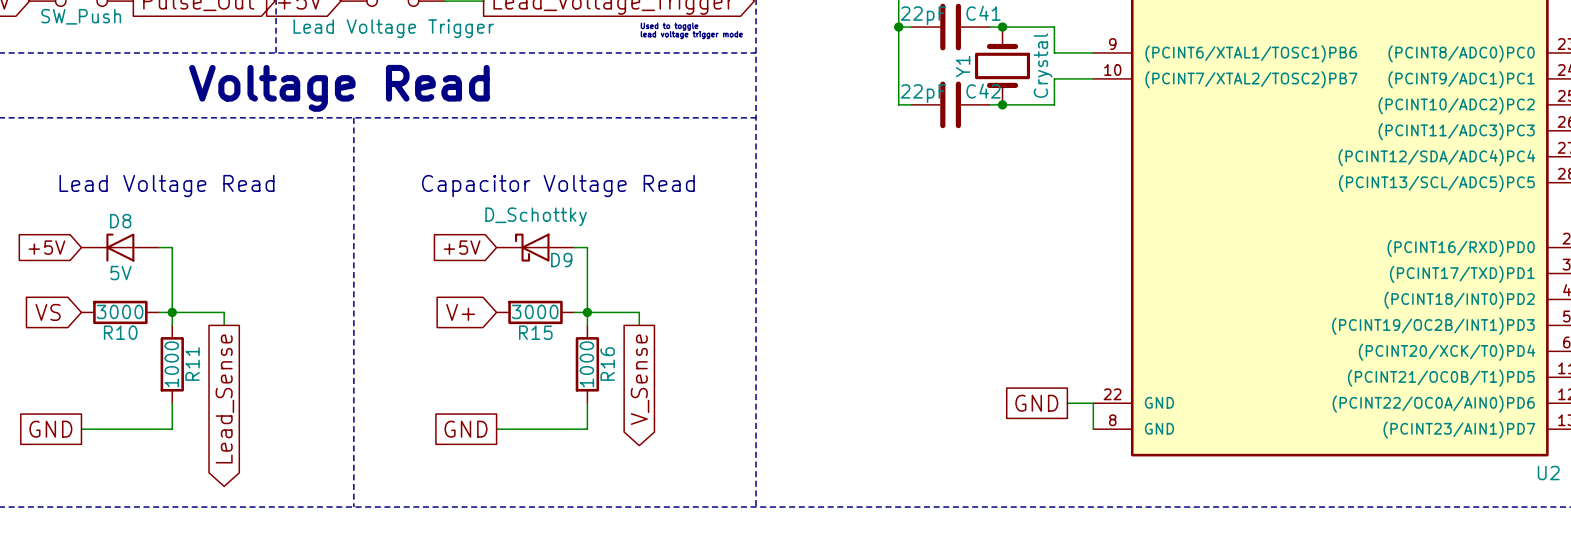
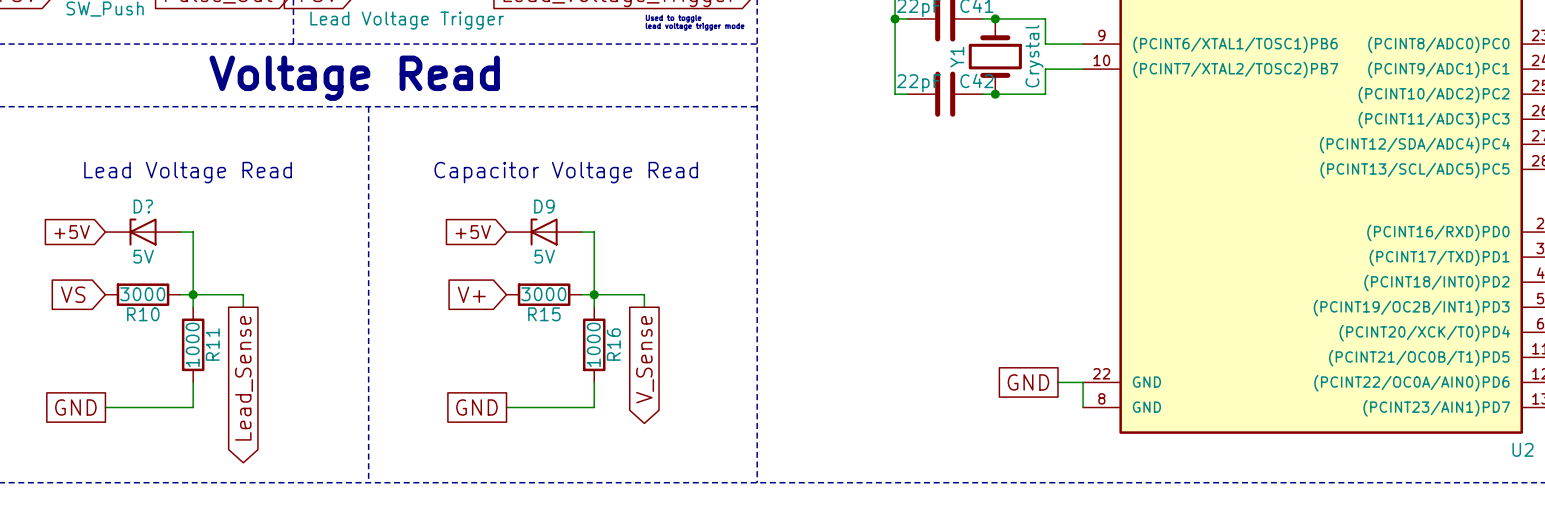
D9 value: D_Schottky (536, 216) -> 5V (544, 256)
D8 name: D8 (120, 221) -> D? (143, 206)
D9 symbol: [496, 233, 575, 262] -> [506, 218, 582, 246]
D9 name position: D9 (561, 260) -> D9 (544, 206)

